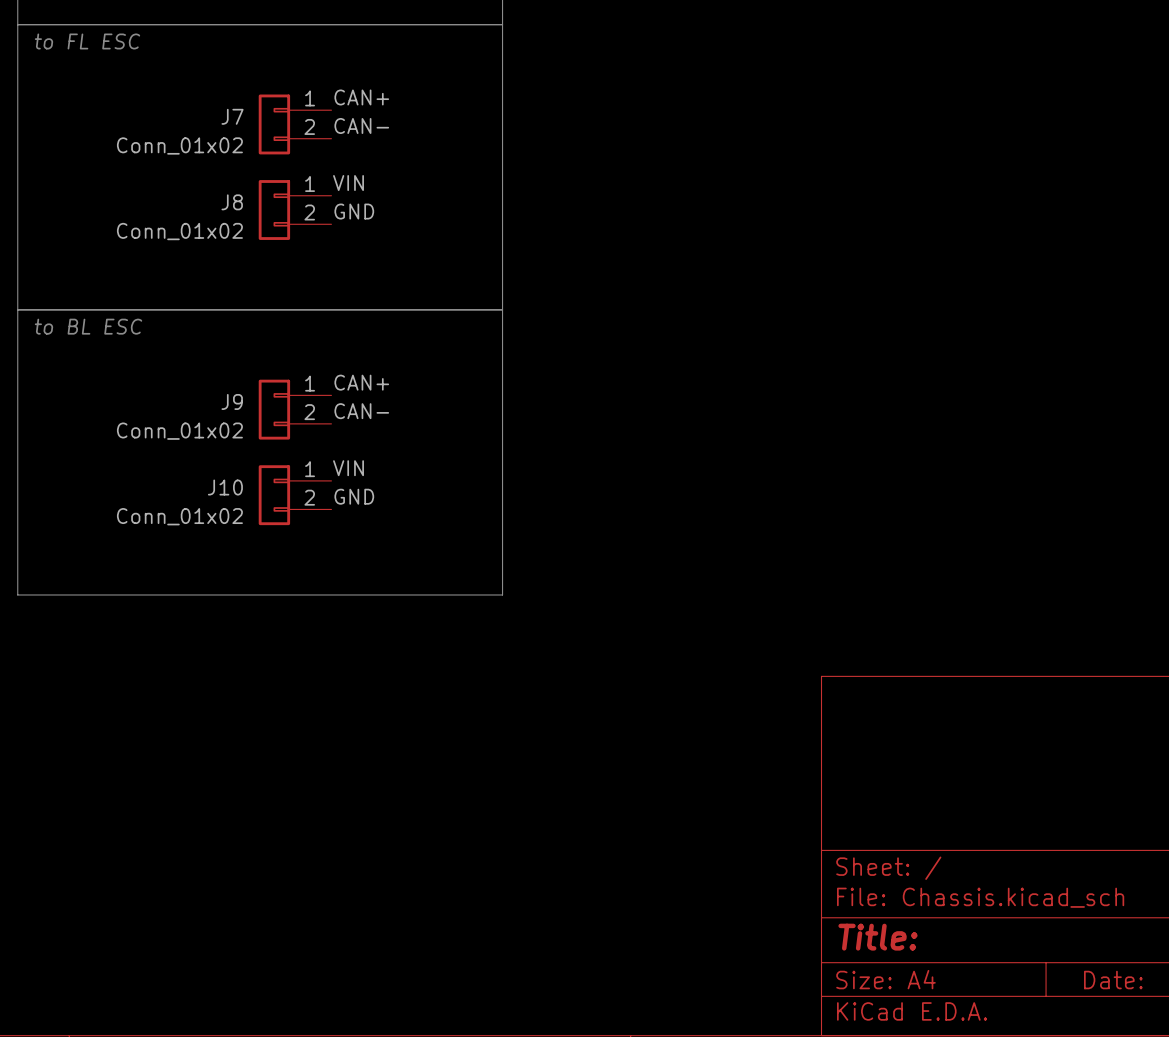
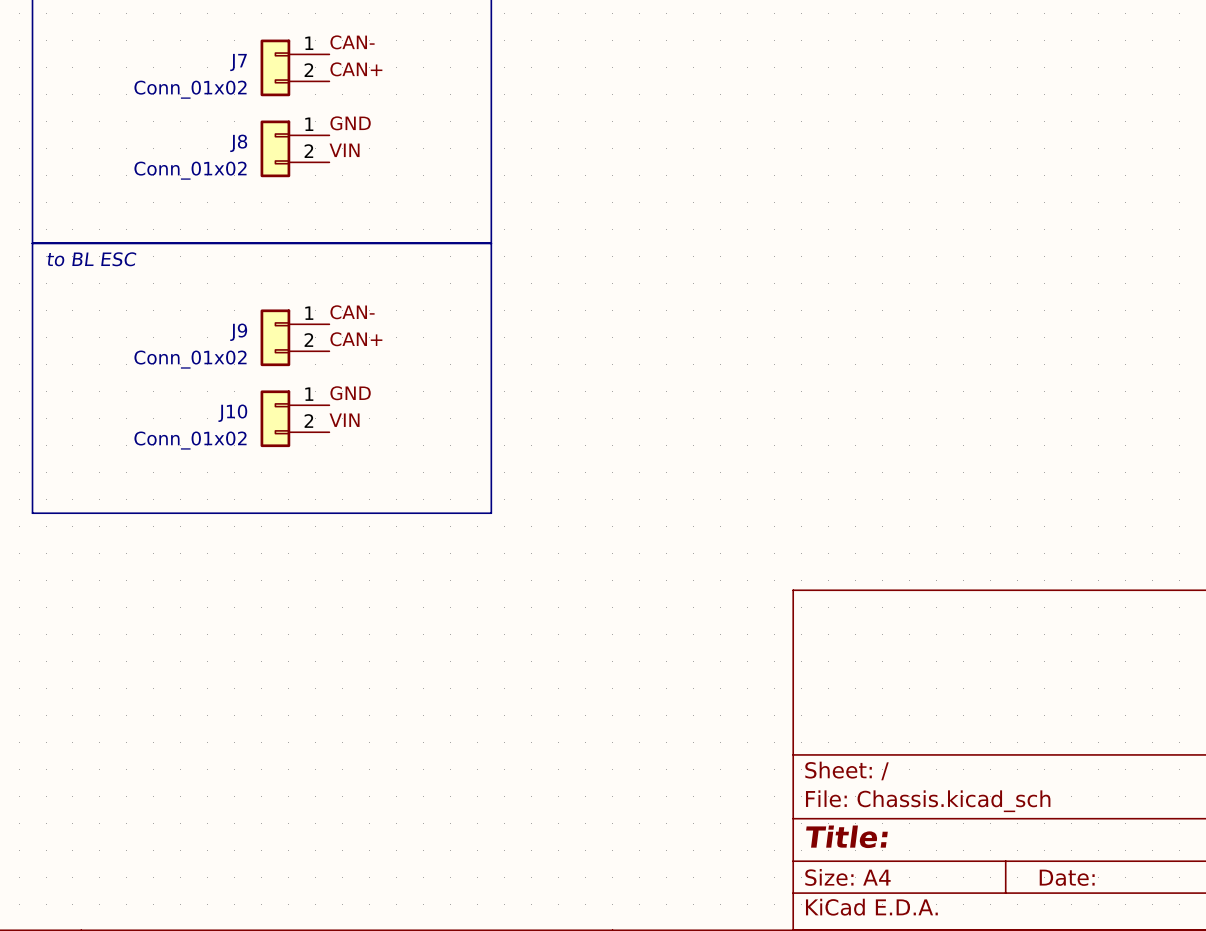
label: CAN+ (361, 97) -> CAN- (352, 42)
label: CAN- (361, 125) -> CAN+ (356, 69)
label: VIN (348, 183) -> GND (350, 123)
label: GND (354, 211) -> VIN (344, 150)
label: CAN+ (361, 382) -> CAN- (352, 312)
label: CAN- (361, 411) -> CAN+ (356, 339)
label: VIN (348, 468) -> GND (350, 393)
label: GND (354, 496) -> VIN (344, 420)

